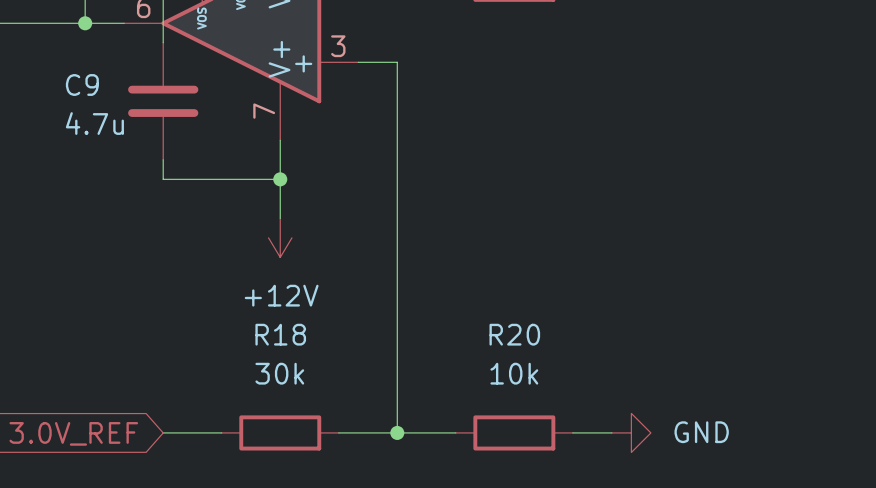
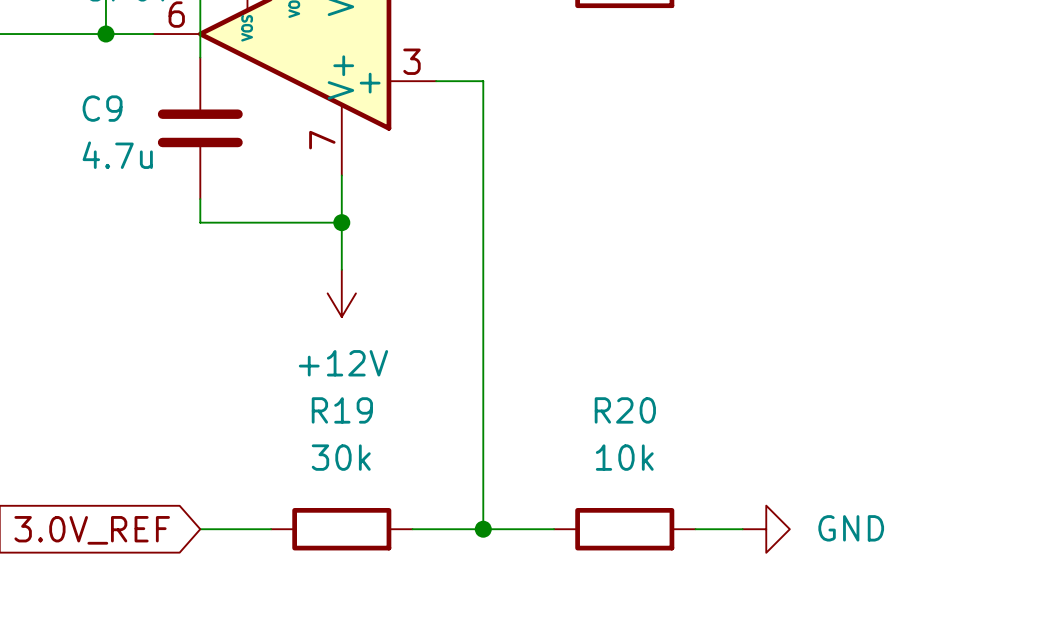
R18 name: R18 (280, 334) -> R19 (342, 410)

